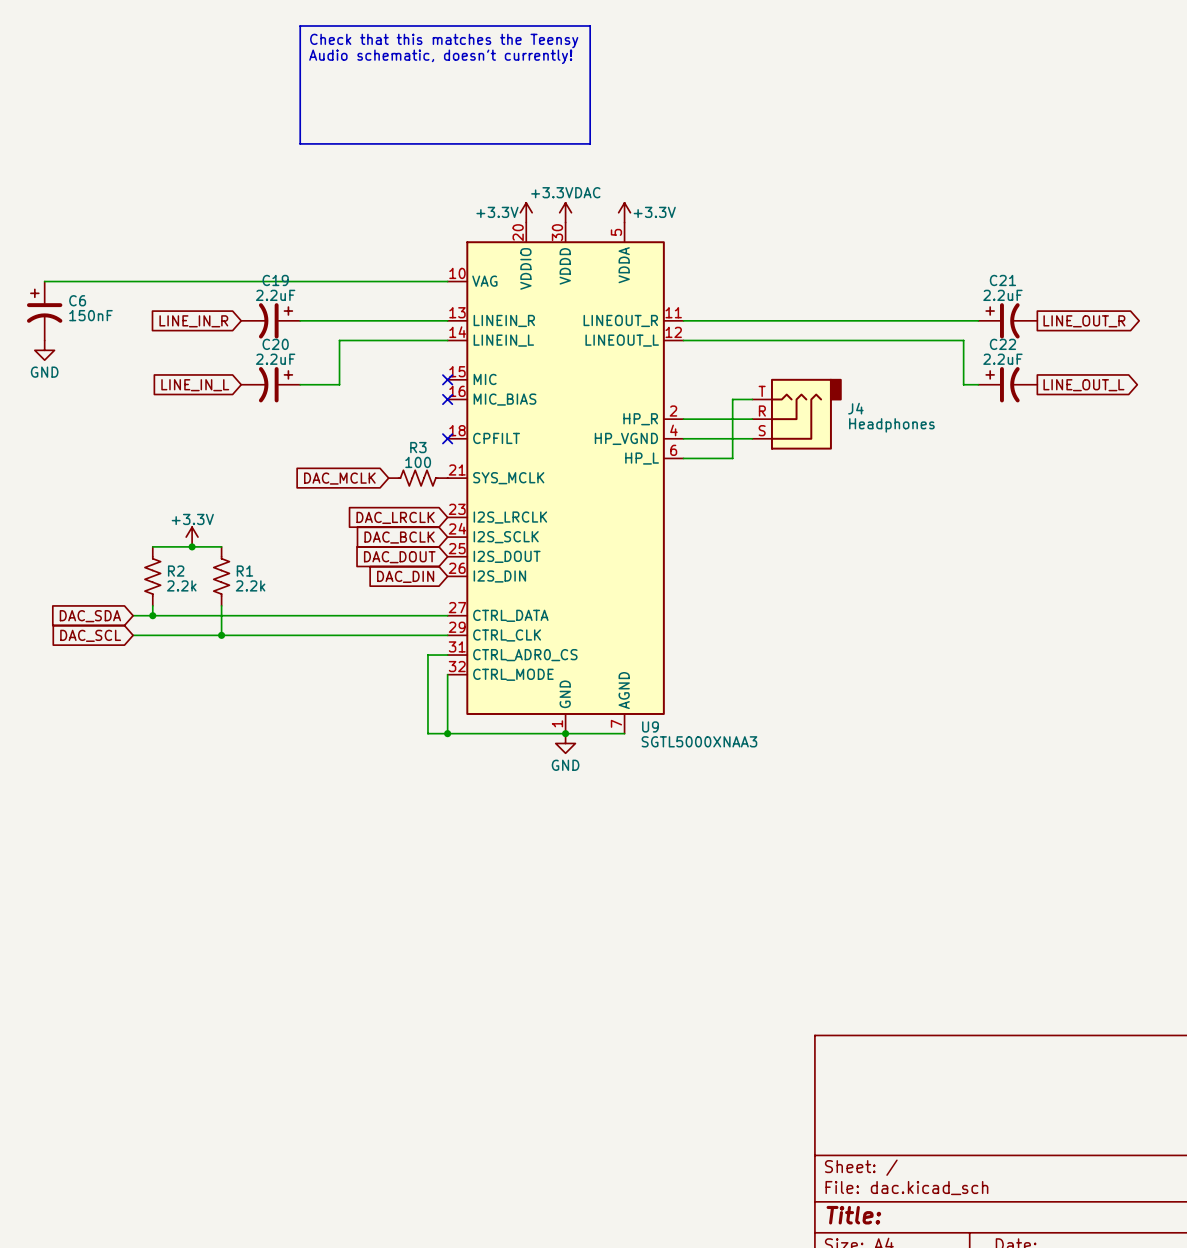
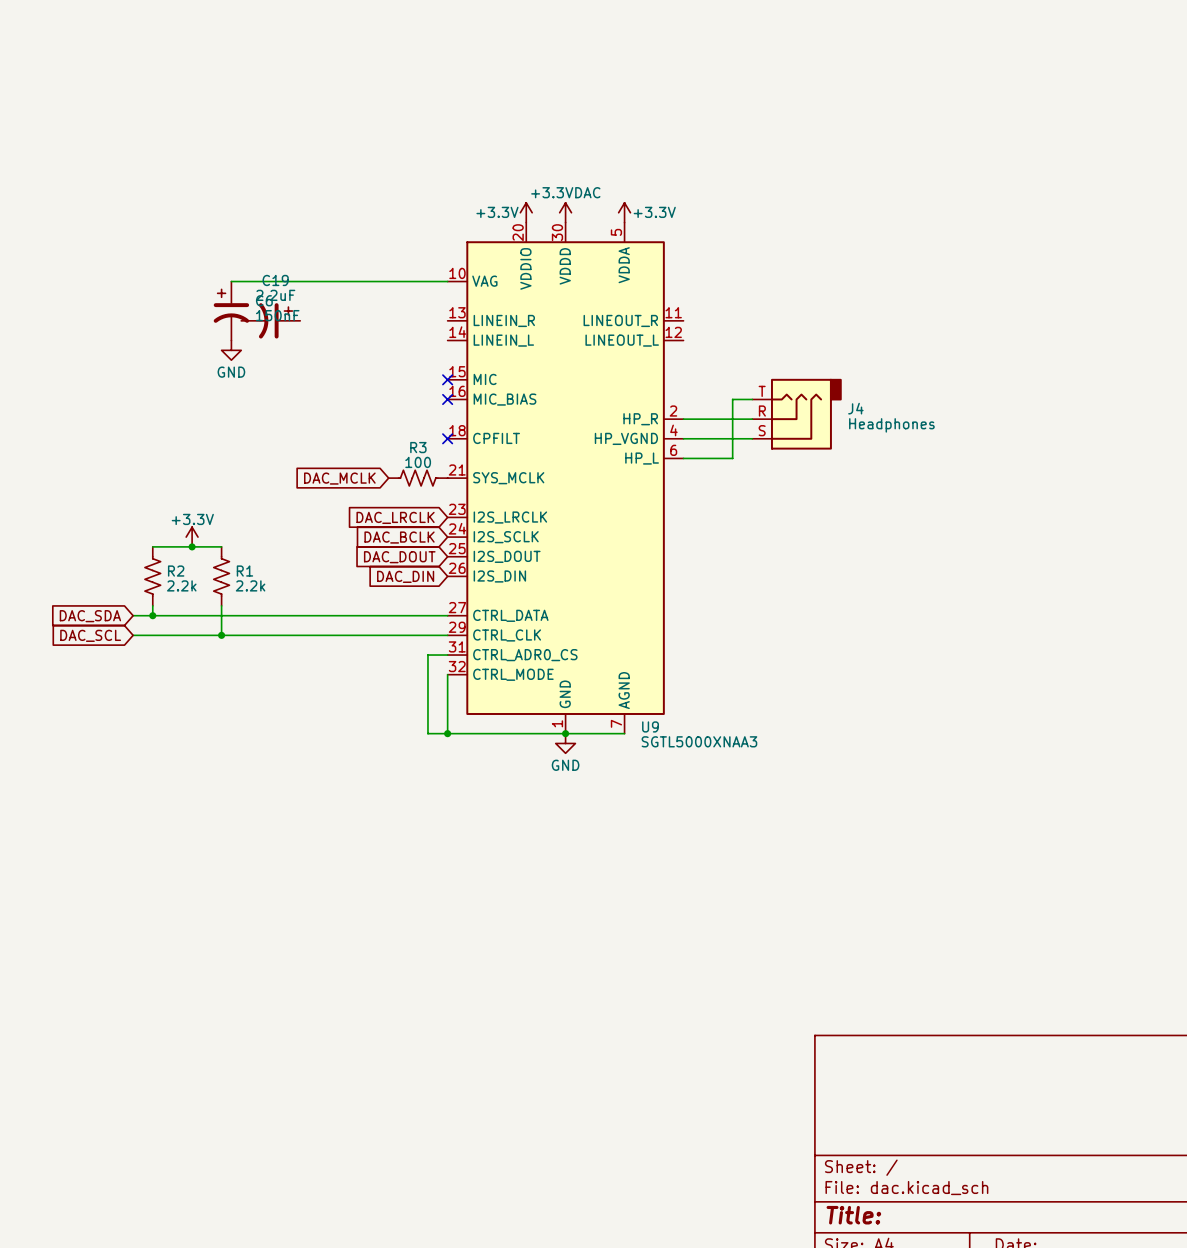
line: (300, 25) (590, 25) (590, 143) (300, 143) (300, 25) -> none
text: Check that this matches the Teensy (444, 40) -> none
text: Audio schematic, doesn't currently! (440, 56) -> none
wire: (44, 281) (231, 281) -> none
C6 position: (44, 311) -> (231, 311)
wire: (300, 320) (447, 320) -> none
wire: (683, 320) (978, 320) -> none
C21: 2.2uF (1007, 320) -> none
global label: LINE_IN_R (193, 321) -> none
global label: LINE_OUT_R (1084, 321) -> none
wire: (447, 340) (339, 340) (339, 384) (300, 384) -> none
wire: (683, 340) (963, 340) (963, 384) (978, 384) -> none
power symbol position: GND (44, 350) -> GND (231, 350)
C20: 2.2uF (270, 384) -> none
C22: 2.2uF (1007, 384) -> none
global label: LINE_IN_L (195, 385) -> none
global label: LINE_OUT_L (1083, 385) -> none

